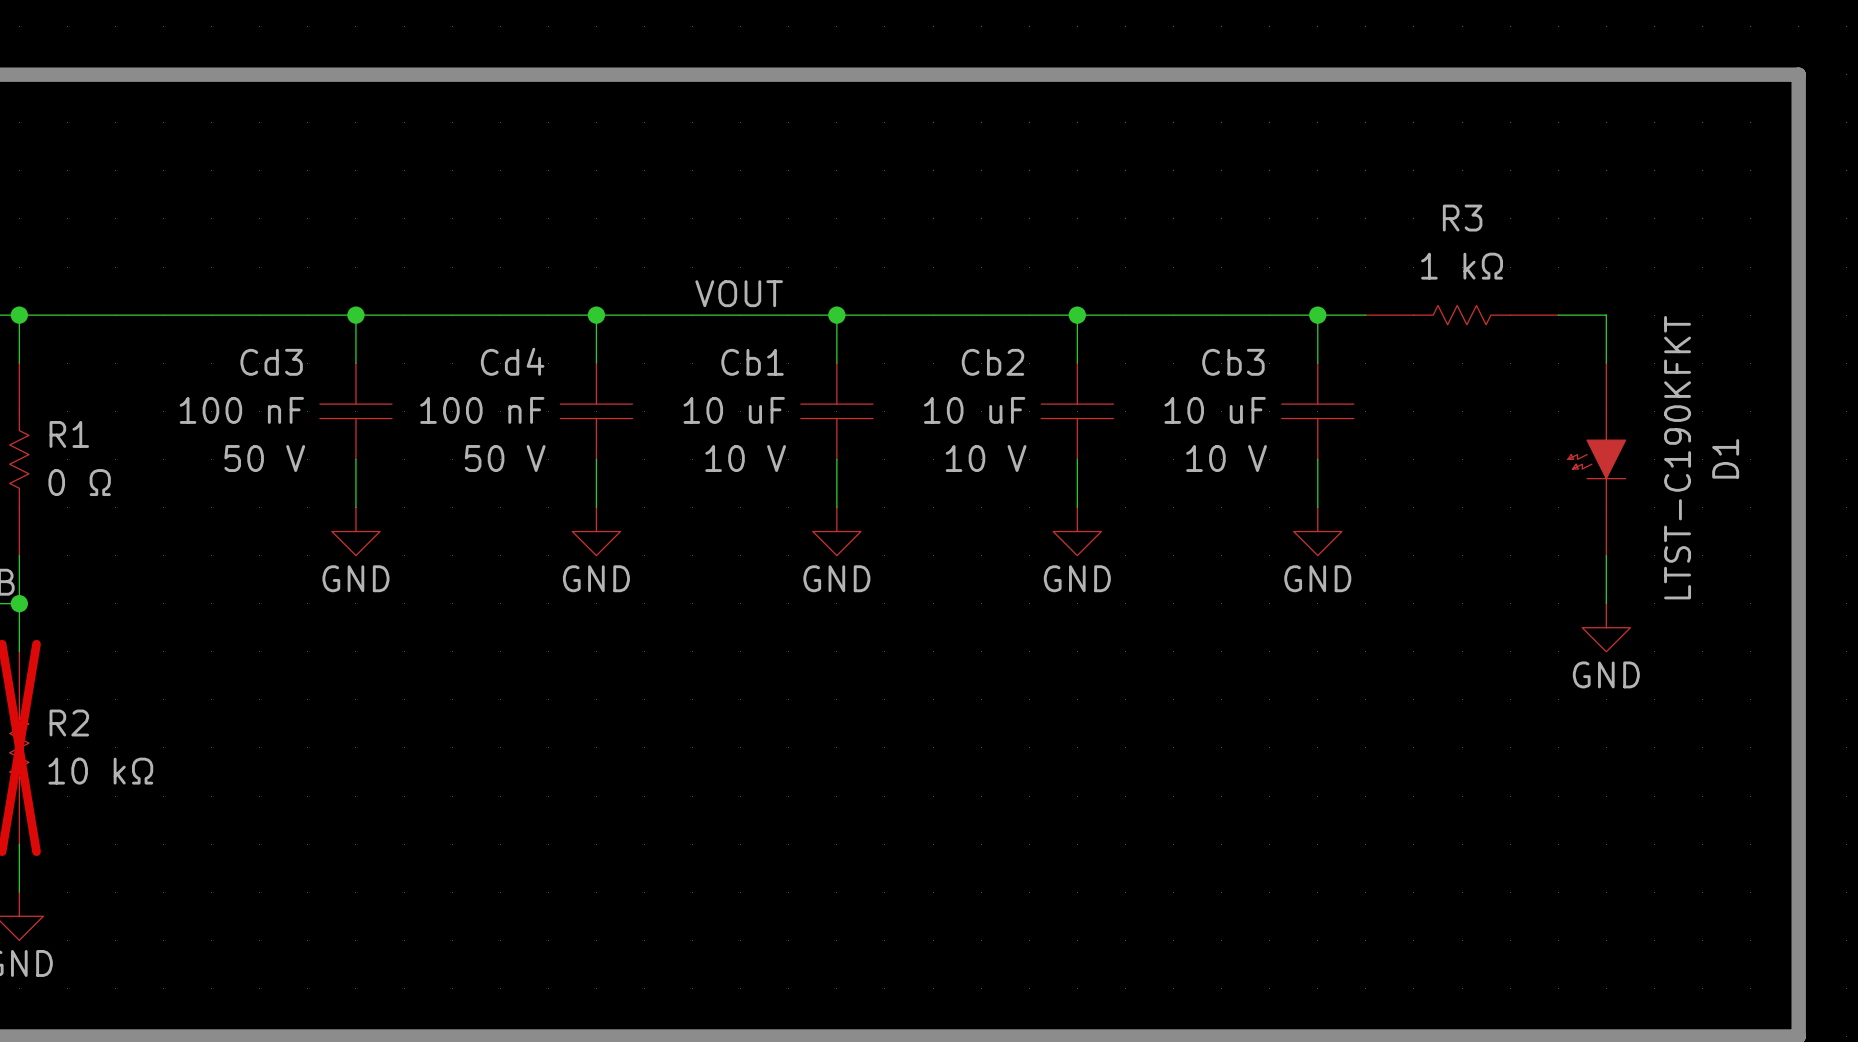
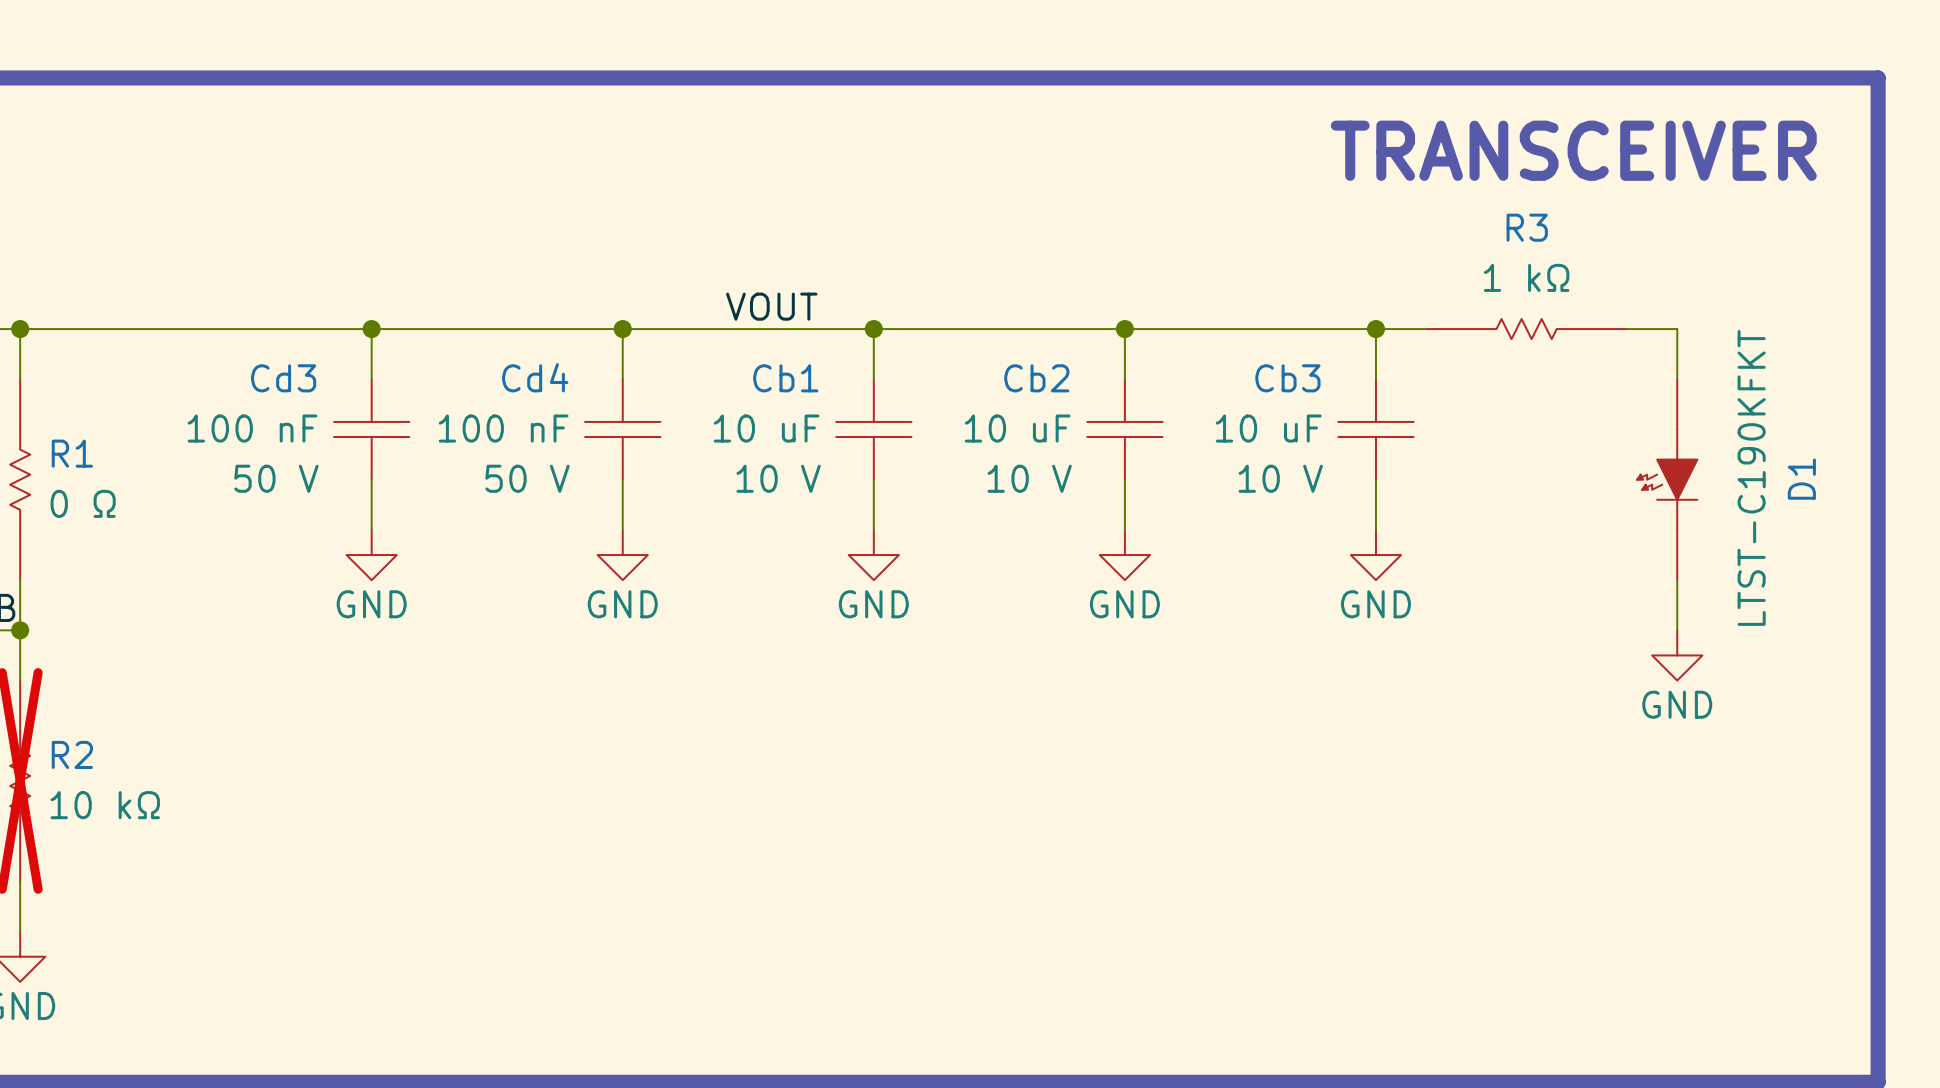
text: none -> TRANSCEIVER (1573, 150)

